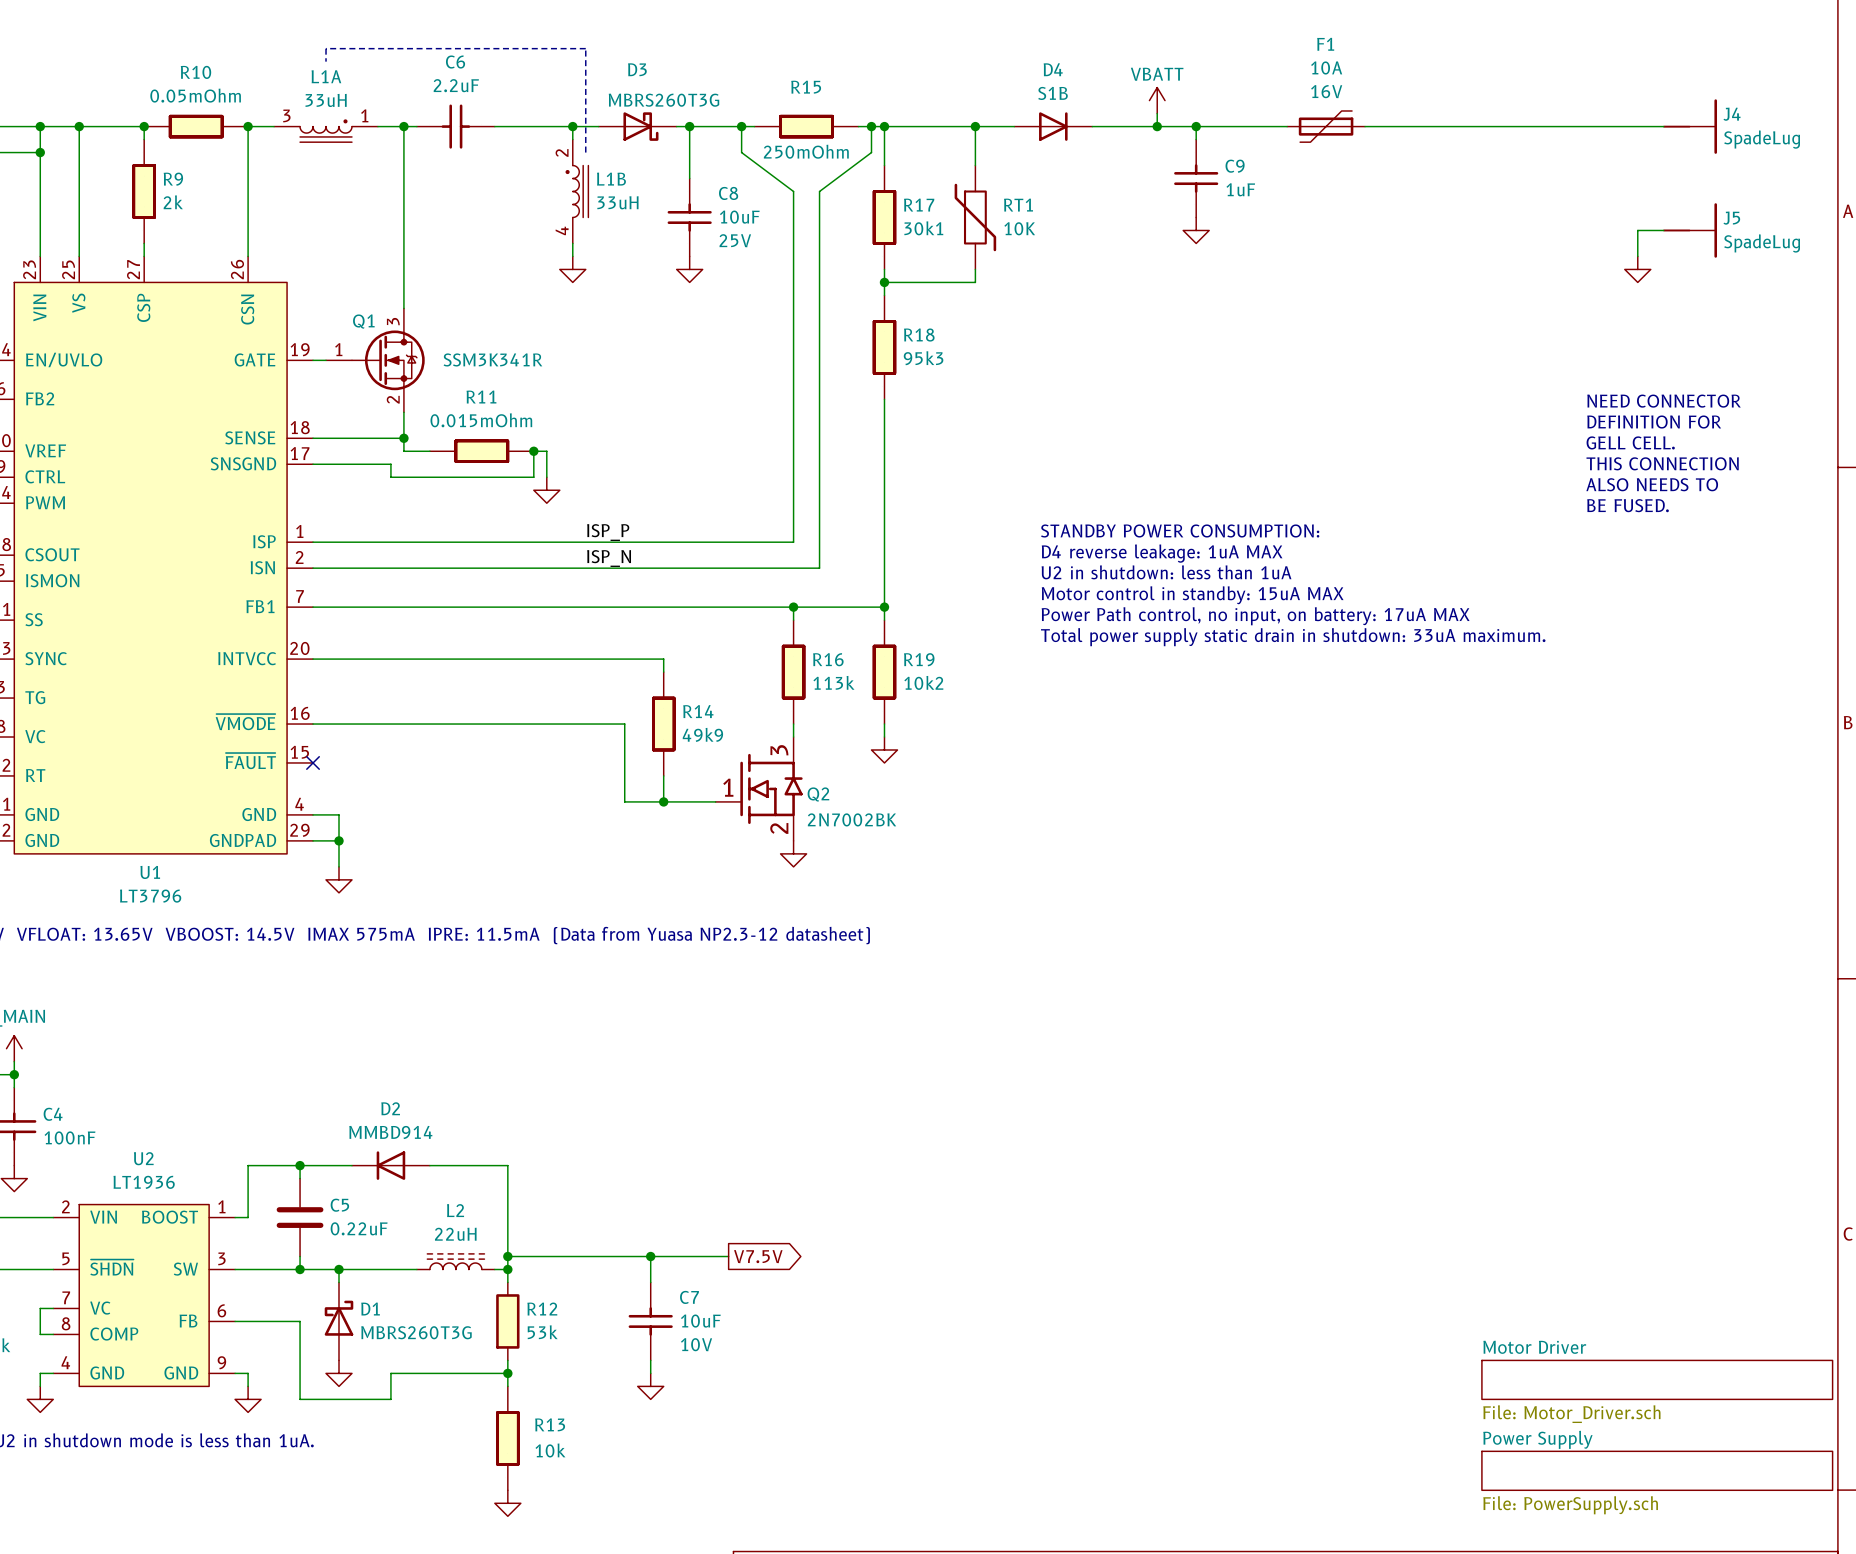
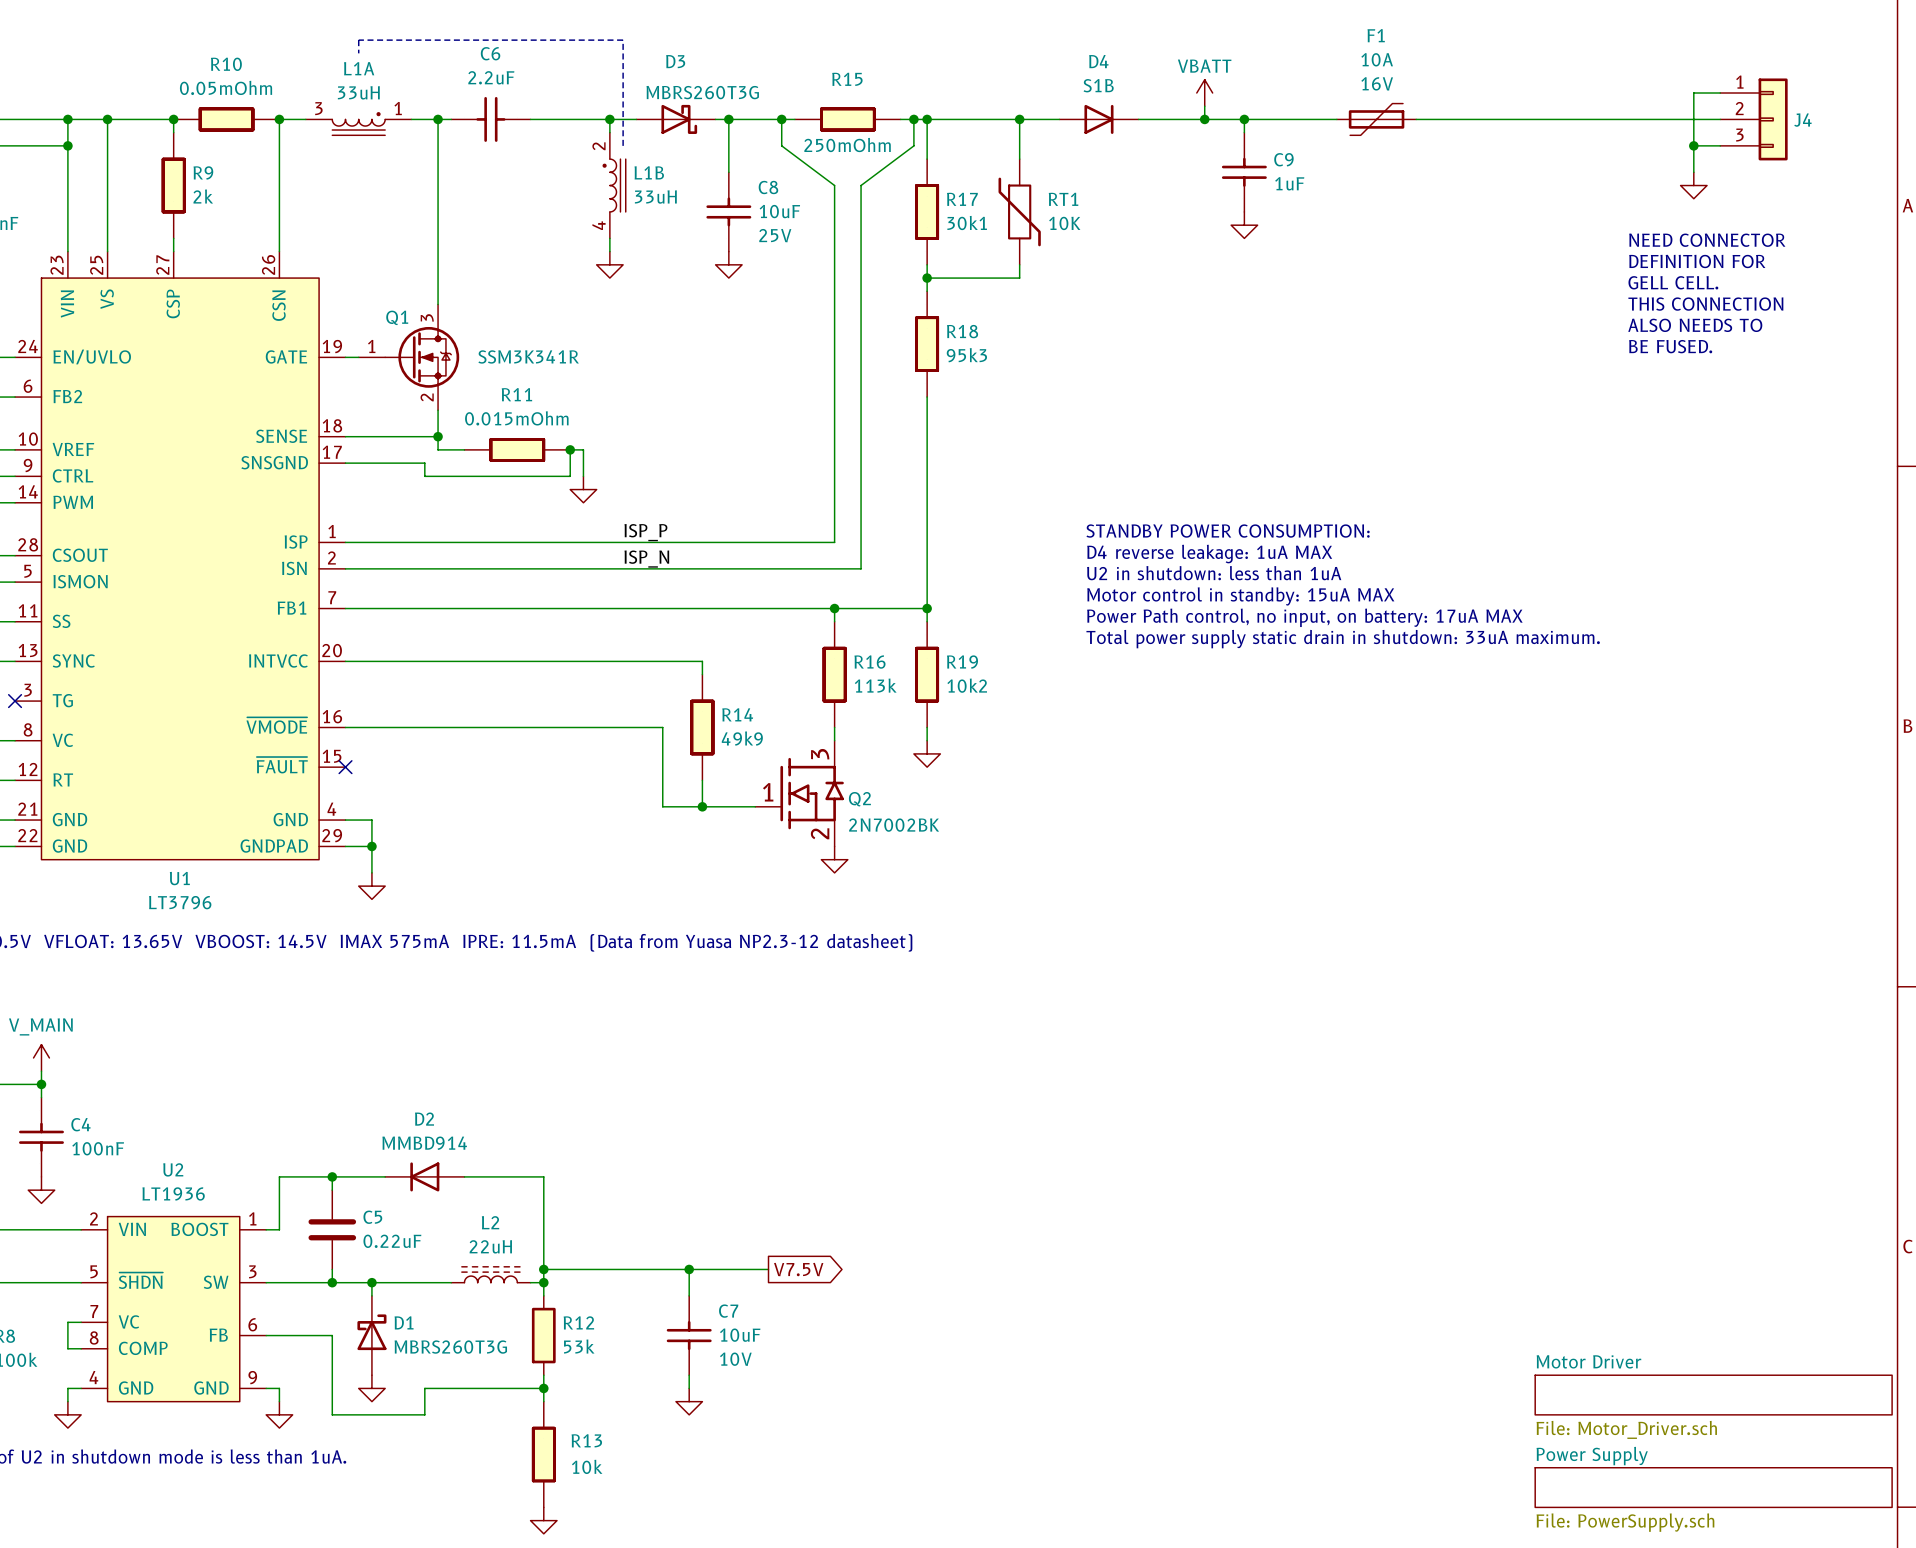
J4 symbol: [1663, 99, 1718, 154] -> [1720, 78, 1788, 161]
wire: none -> (1720, 93) (1693, 93) (1693, 172)
J4 value: SpadeLug (1762, 139) -> none
wire: none -> (1693, 145) (1720, 145)
junction: none -> (1693, 145)
wire: (1663, 230) (1637, 230) (1637, 256) -> none
J5: SpadeLug (1690, 230) -> none
power symbol position: (1637, 269) -> (1693, 185)
text position: NEED CONNECTOR (1664, 401) -> NEED CONNECTOR (1707, 240)
text position: DEFINITION FOR (1654, 422) -> DEFINITION FOR (1697, 261)
text position: GELL CELL. (1630, 442) -> GELL CELL. (1673, 282)
text position: THIS CONNECTION (1662, 463) -> THIS CONNECTION (1705, 304)
text position: ALSO NEEDS TO (1652, 484) -> ALSO NEEDS TO (1695, 325)
text position: BE FUSED. (1628, 505) -> BE FUSED. (1670, 346)

